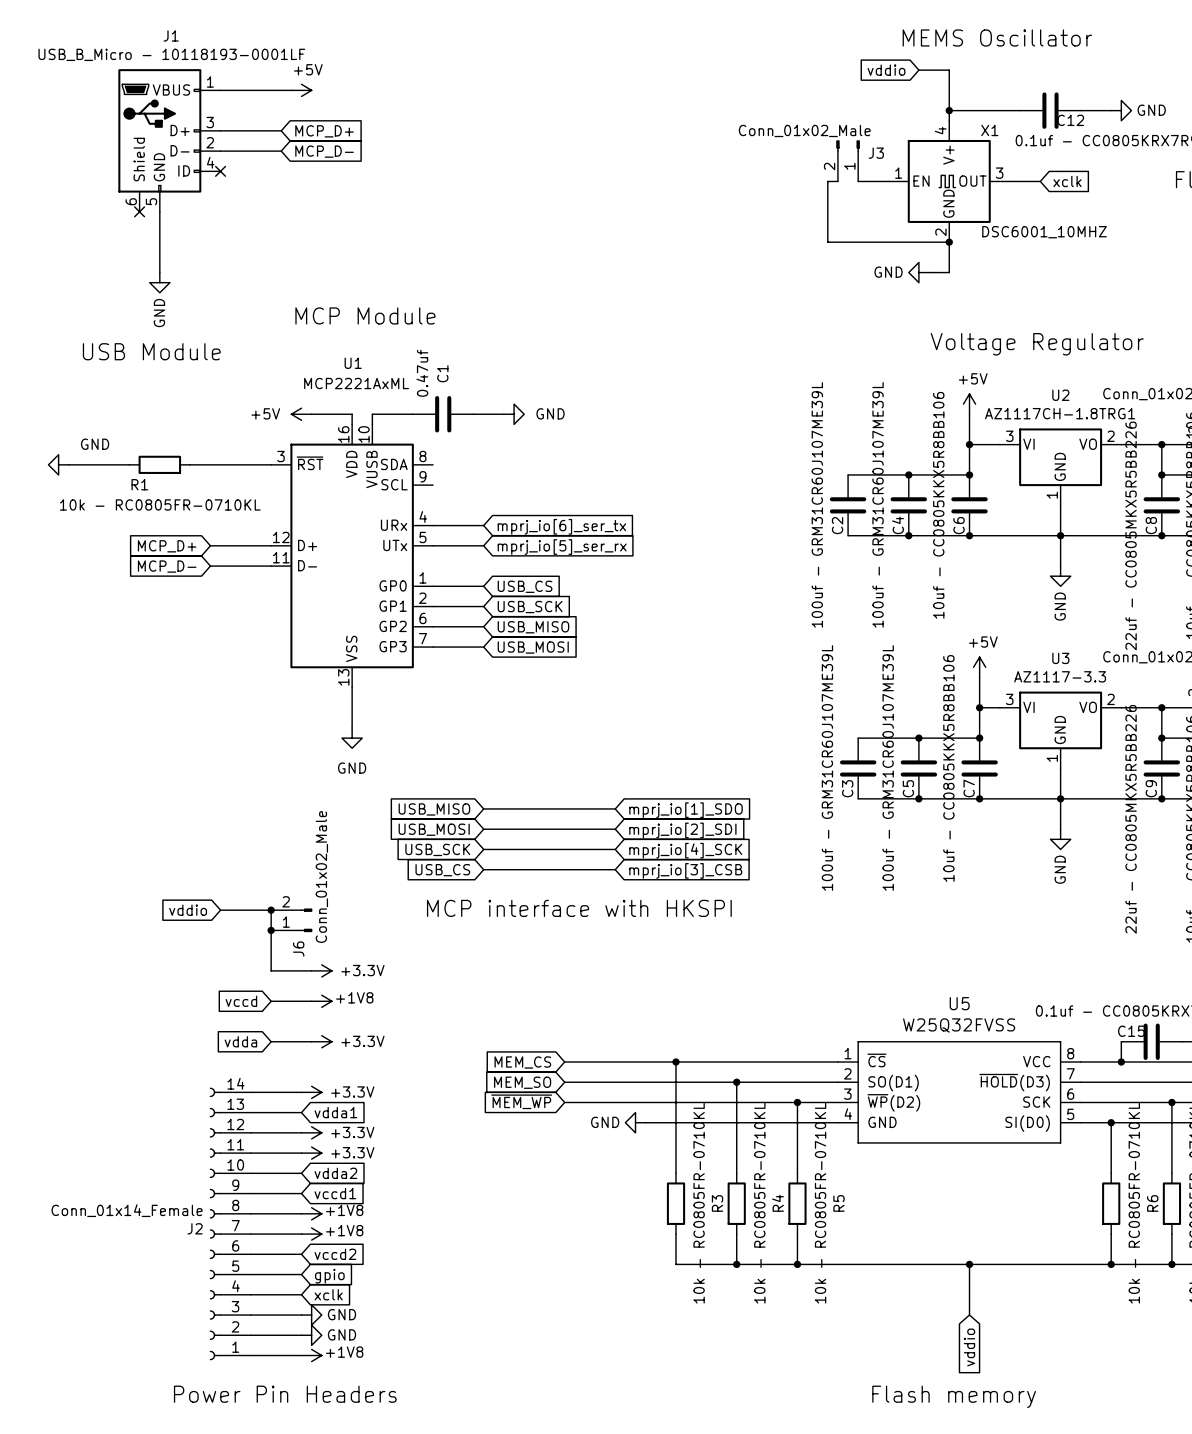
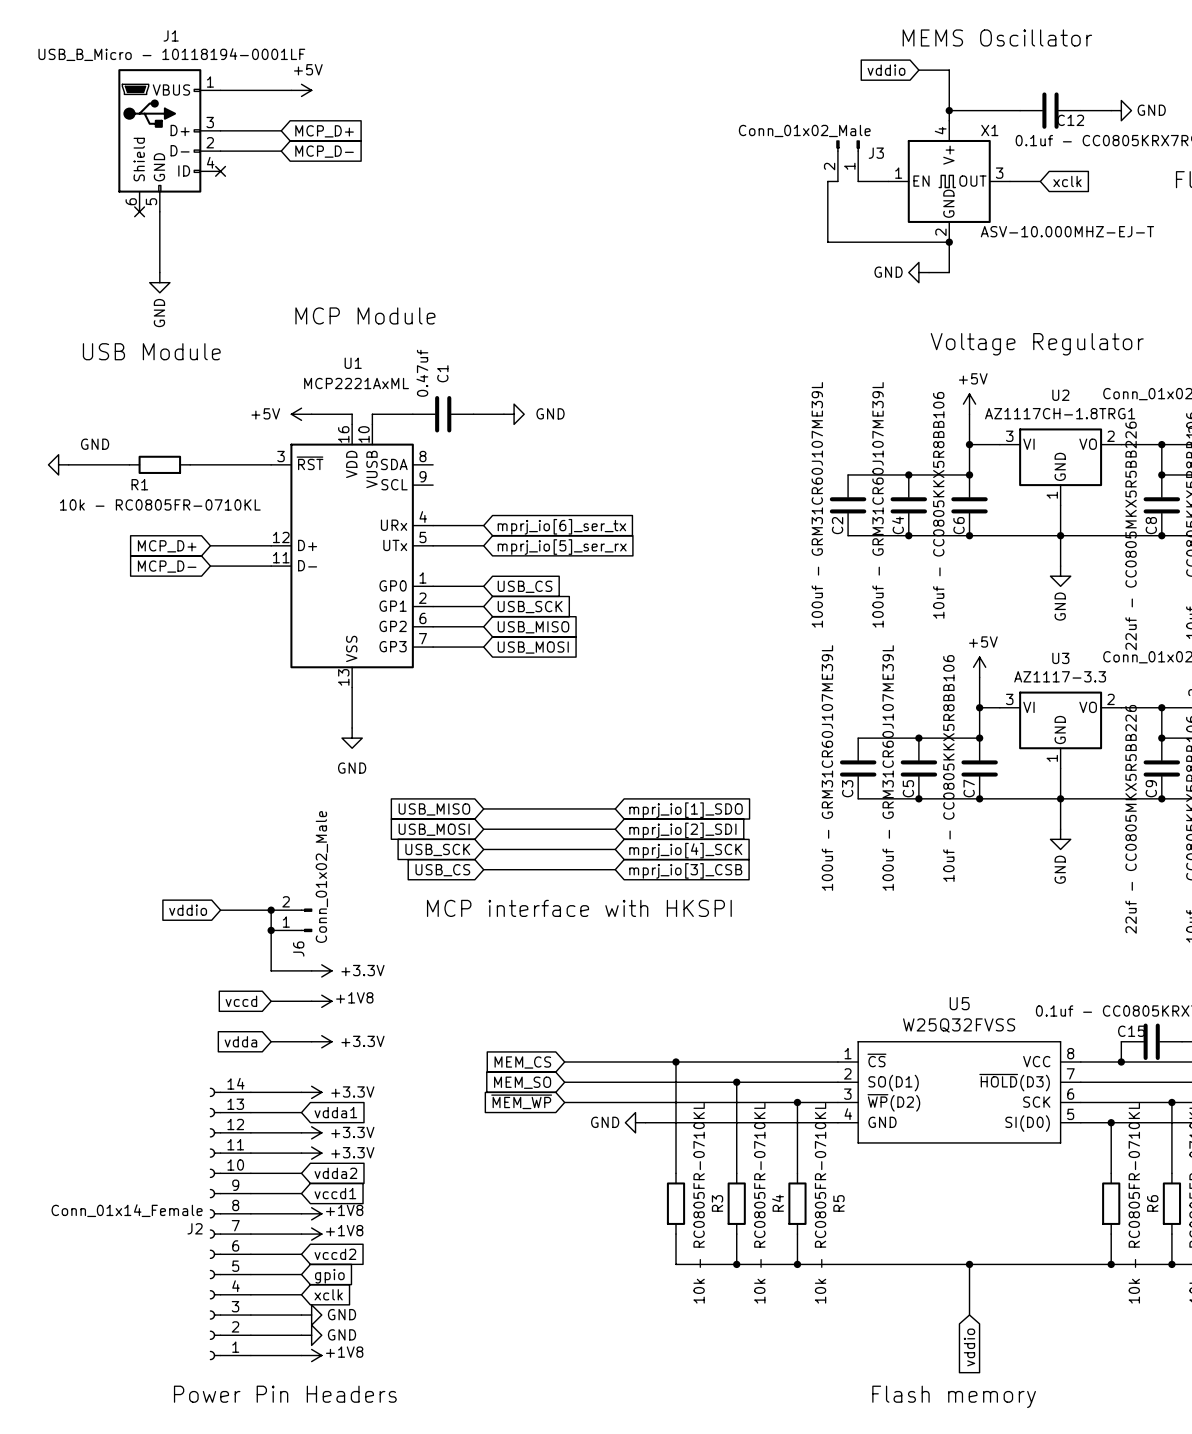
J1 value: USB_B_Micro - 10118193-0001LF (171, 54) -> USB_B_Micro - 10118194-0001LF (171, 54)
X1 value: DSC6001_10MHZ (1044, 232) -> ASV-10.000MHZ-EJ-T (1067, 231)

